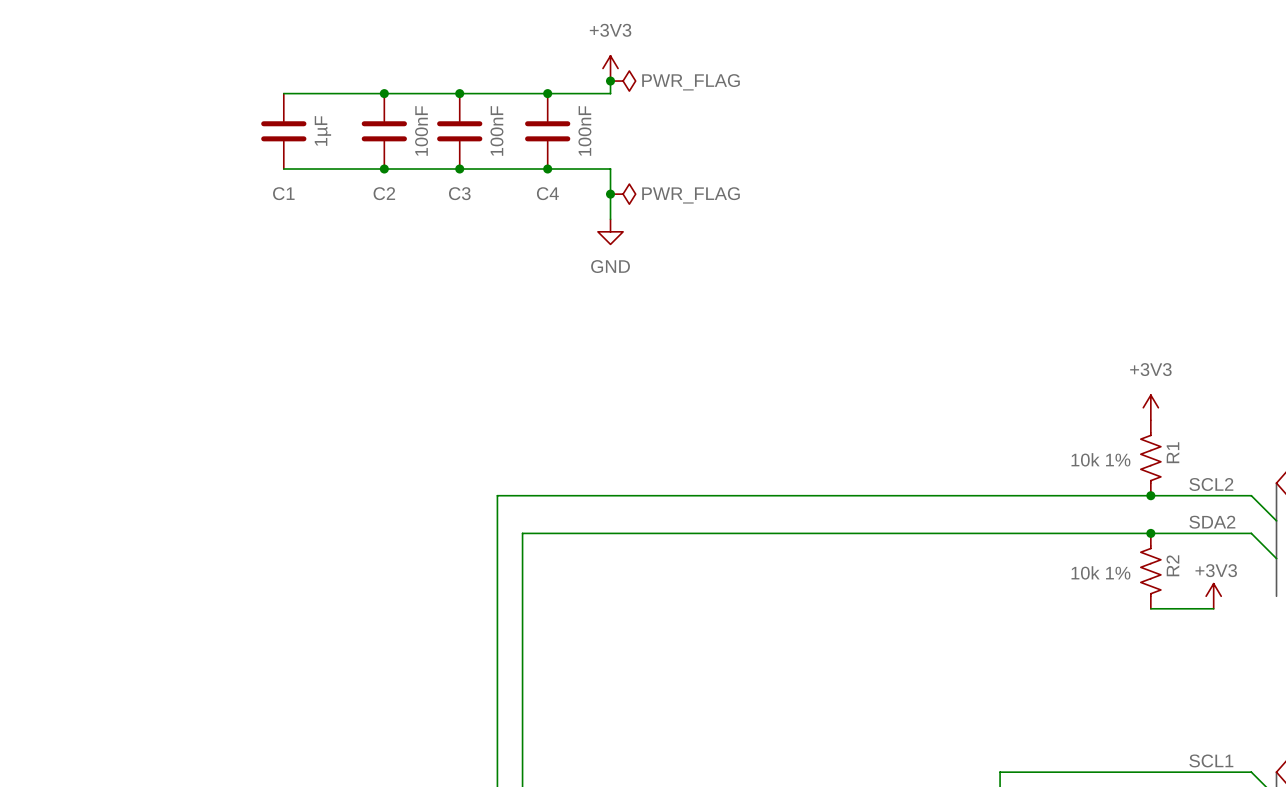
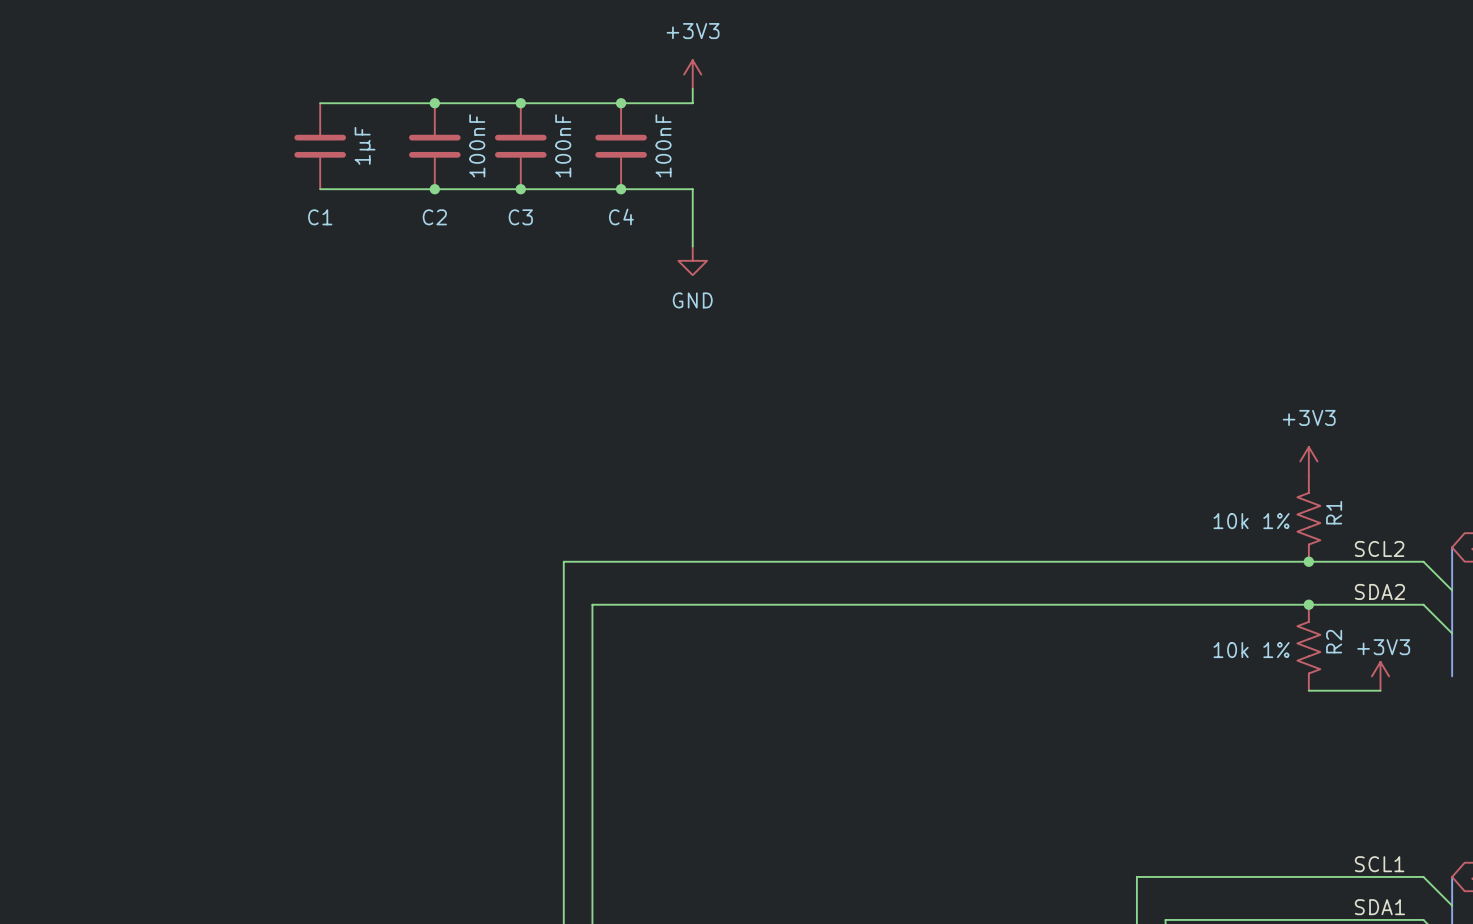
junction: (610, 81) -> none
power symbol: PWR_FLAG (623, 81) -> none
junction: (610, 194) -> none
power symbol: PWR_FLAG (623, 194) -> none

